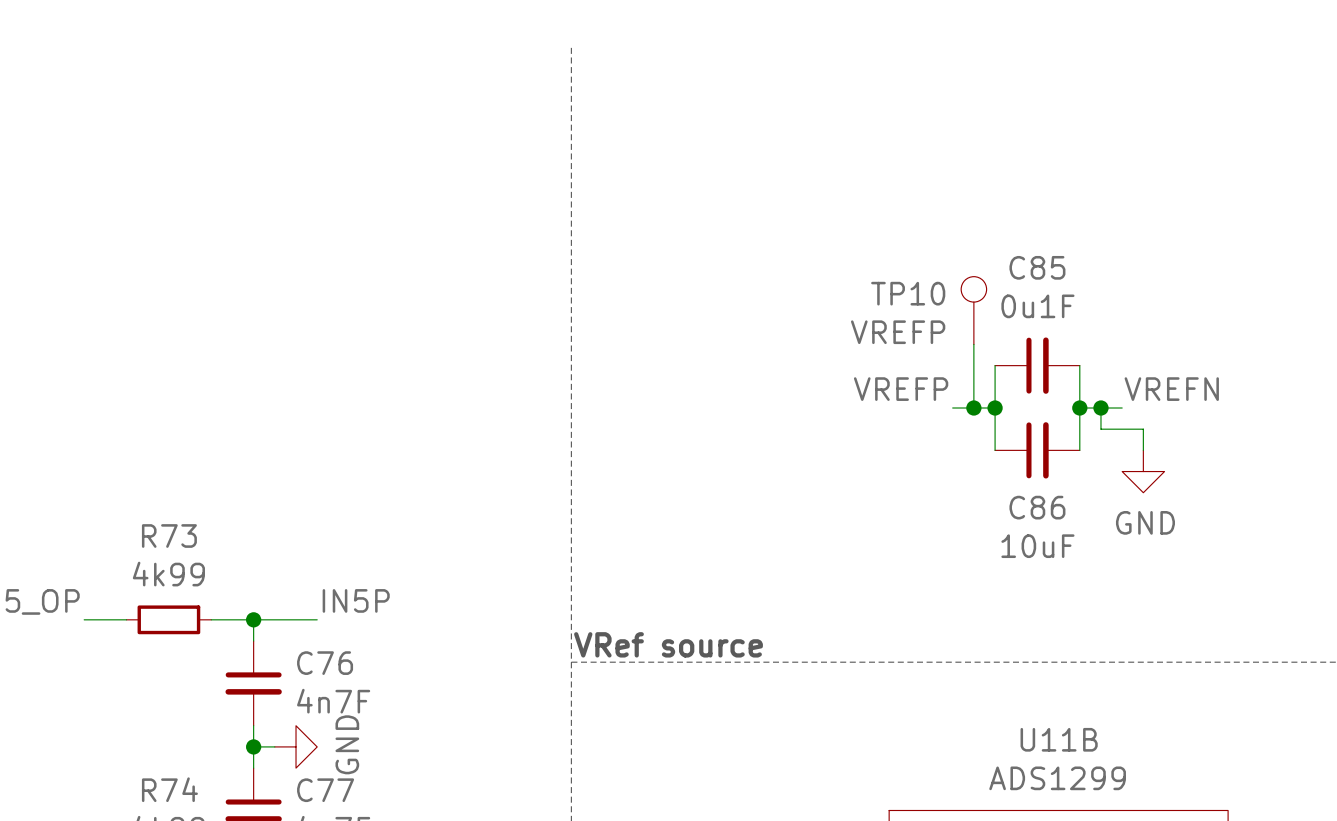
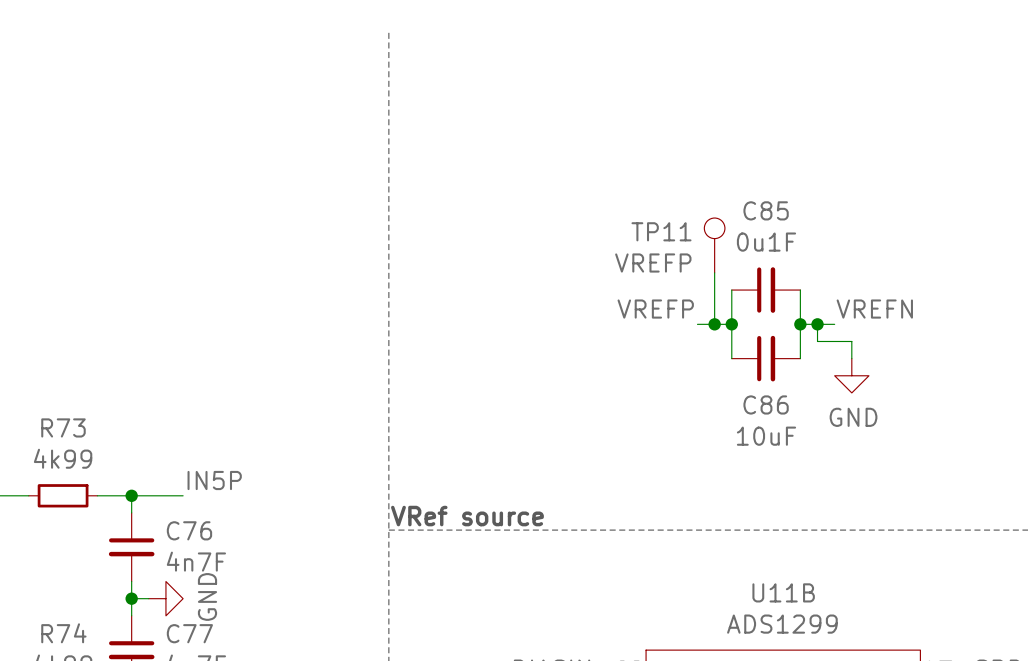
TP10 name: TP10 (908, 293) -> TP11 (661, 231)

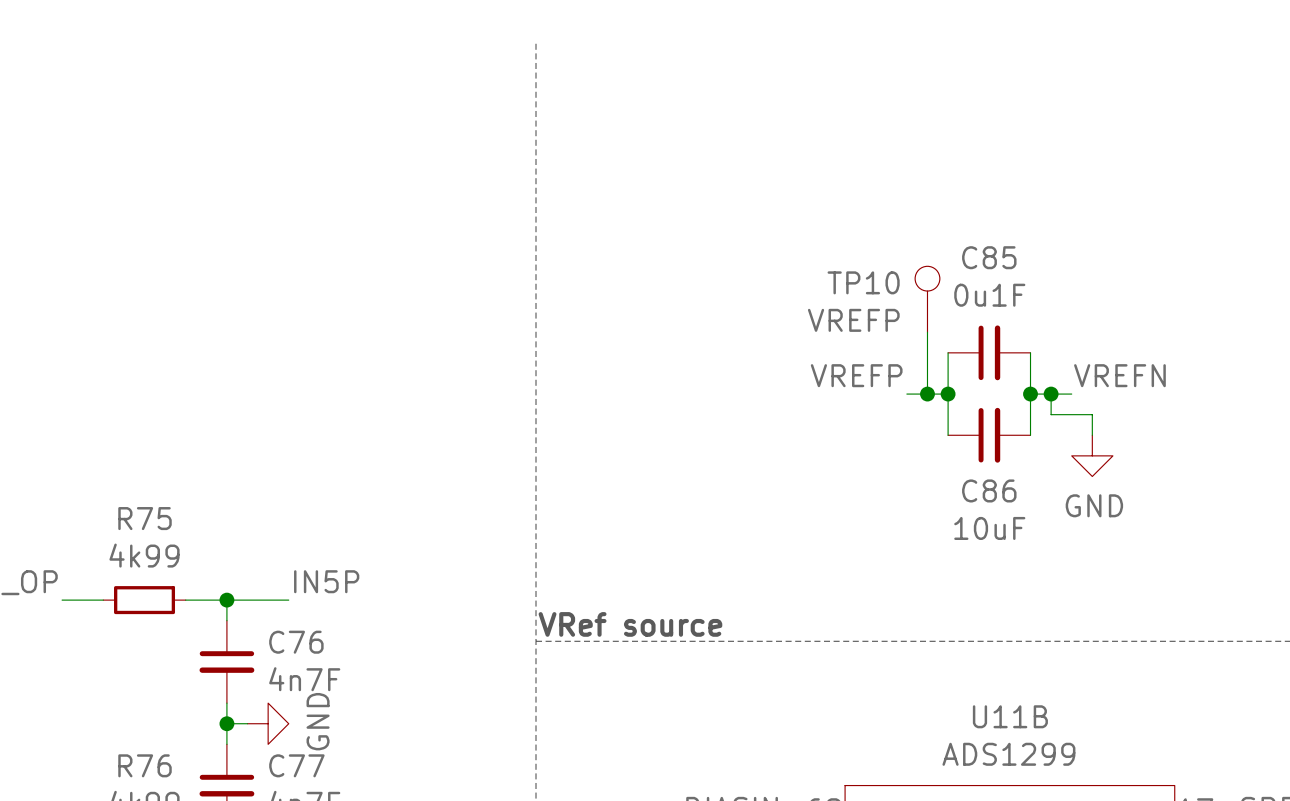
TP11 name: TP11 (661, 231) -> TP10 (863, 282)
R73 name: R73 (63, 427) -> R75 (145, 518)
R74 name: R74 (63, 633) -> R76 (145, 765)

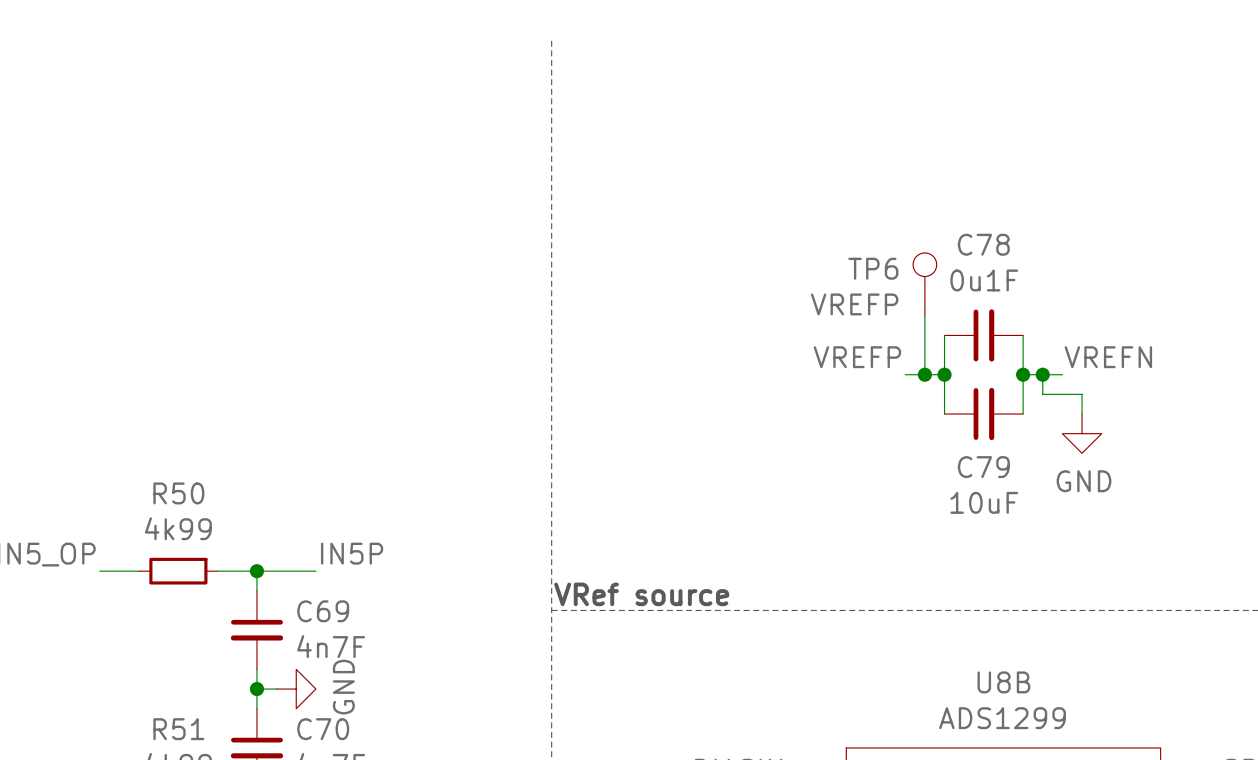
C85 name: C85 (989, 257) -> C78 (983, 244)
TP10 name: TP10 (863, 282) -> TP6 (873, 268)
C86 name: C86 (989, 490) -> C79 (983, 467)
R75 name: R75 (145, 518) -> R50 (178, 493)
C76 name: C76 (296, 642) -> C69 (323, 611)
U11B name: U11B (1010, 716) -> U8B (1003, 682)
R76 name: R76 (145, 765) -> R51 (178, 729)
C77 name: C77 (296, 765) -> C70 (323, 729)

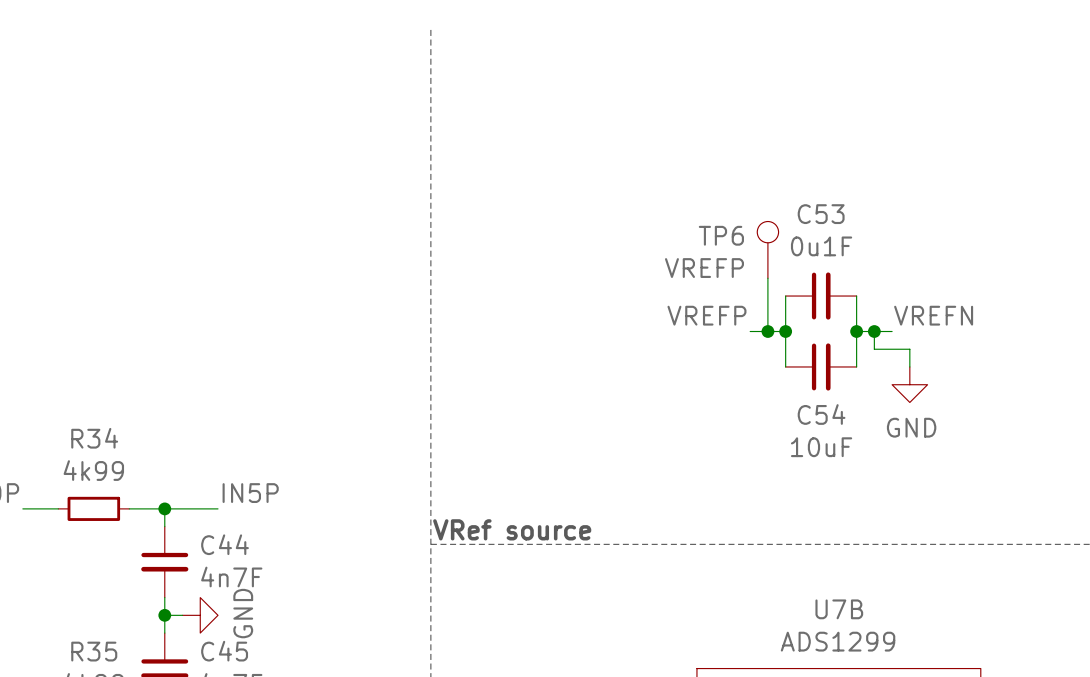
C78 name: C78 (983, 244) -> C53 (821, 214)
C79 name: C79 (983, 467) -> C54 (821, 414)
R50 name: R50 (178, 493) -> R34 (94, 438)
C69 name: C69 (323, 611) -> C44 (225, 544)
U8B name: U8B (1003, 682) -> U7B (839, 609)
R51 name: R51 (178, 729) -> R35 (94, 651)
C70 name: C70 (323, 729) -> C45 (224, 651)

